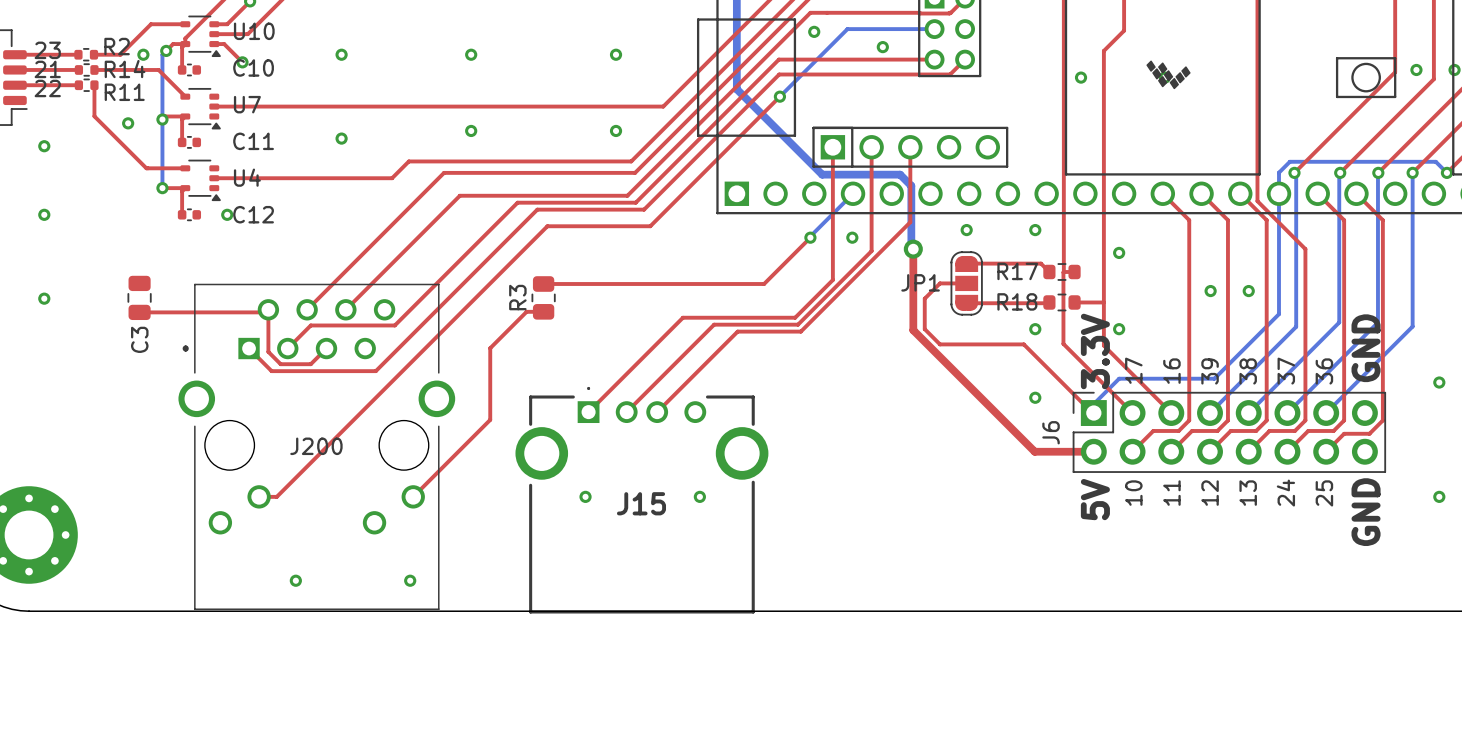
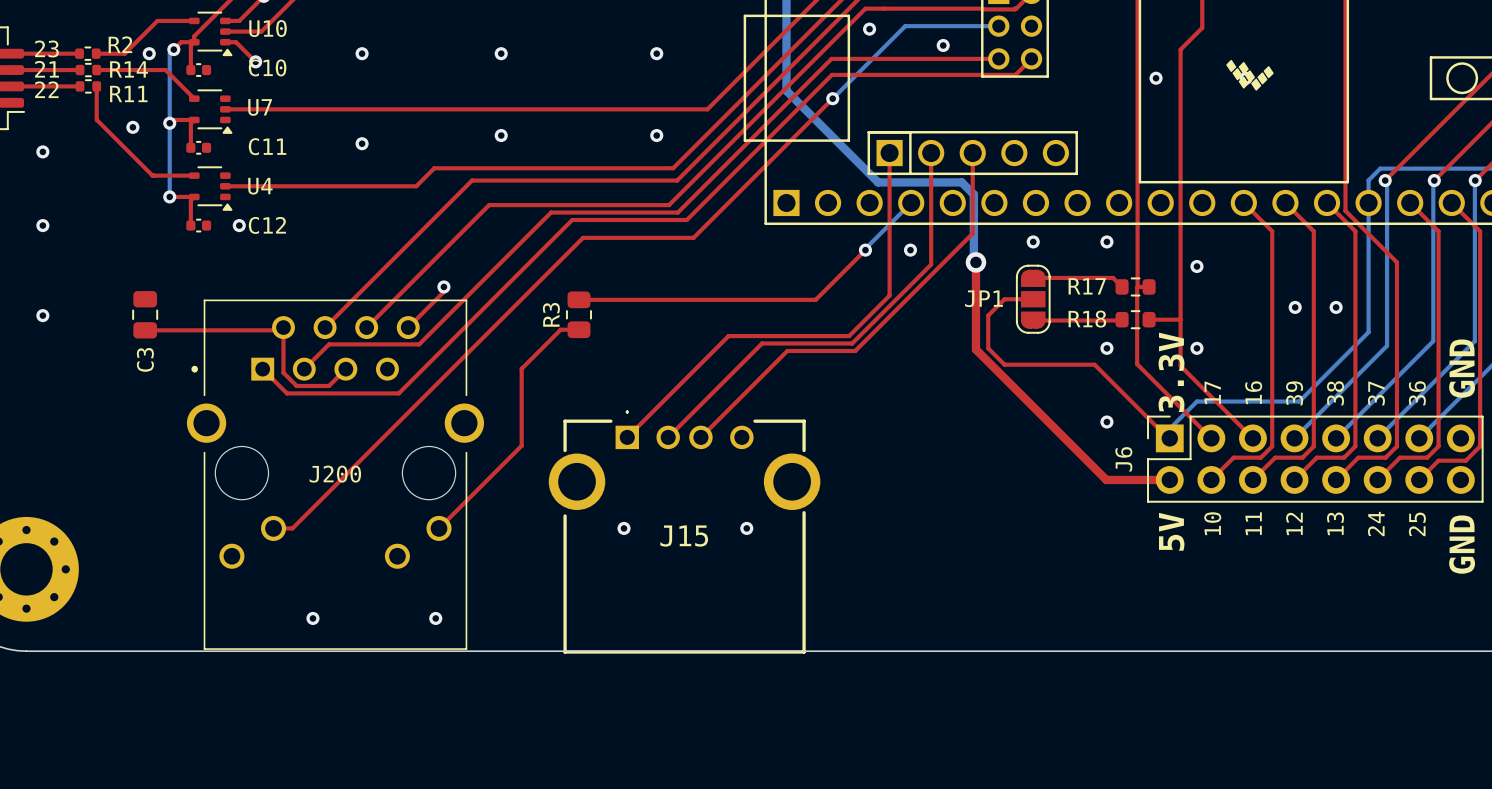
top track: none -> (443, 286) (443, 291) (408, 327)
via: none -> (443, 286)

